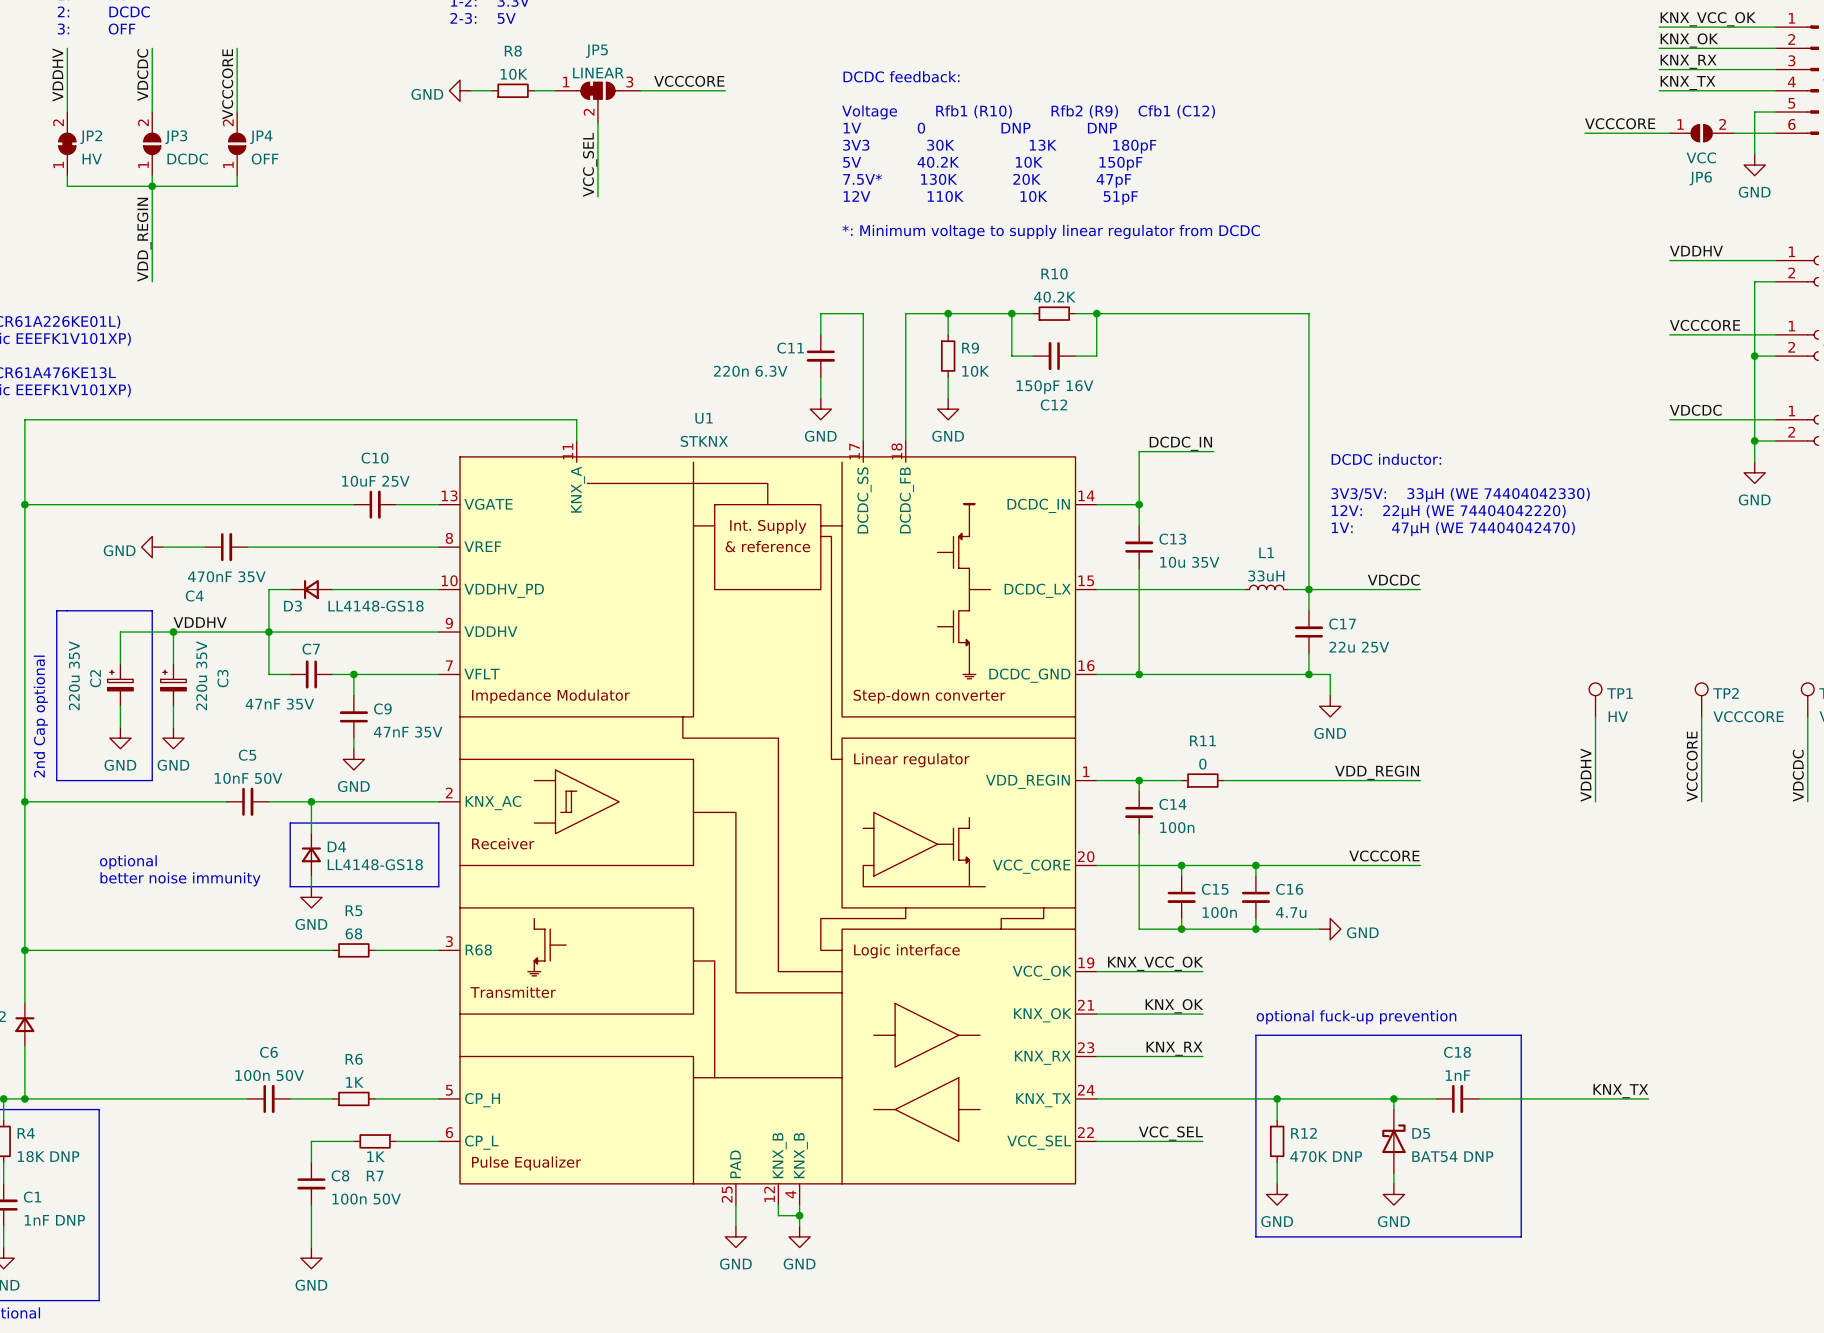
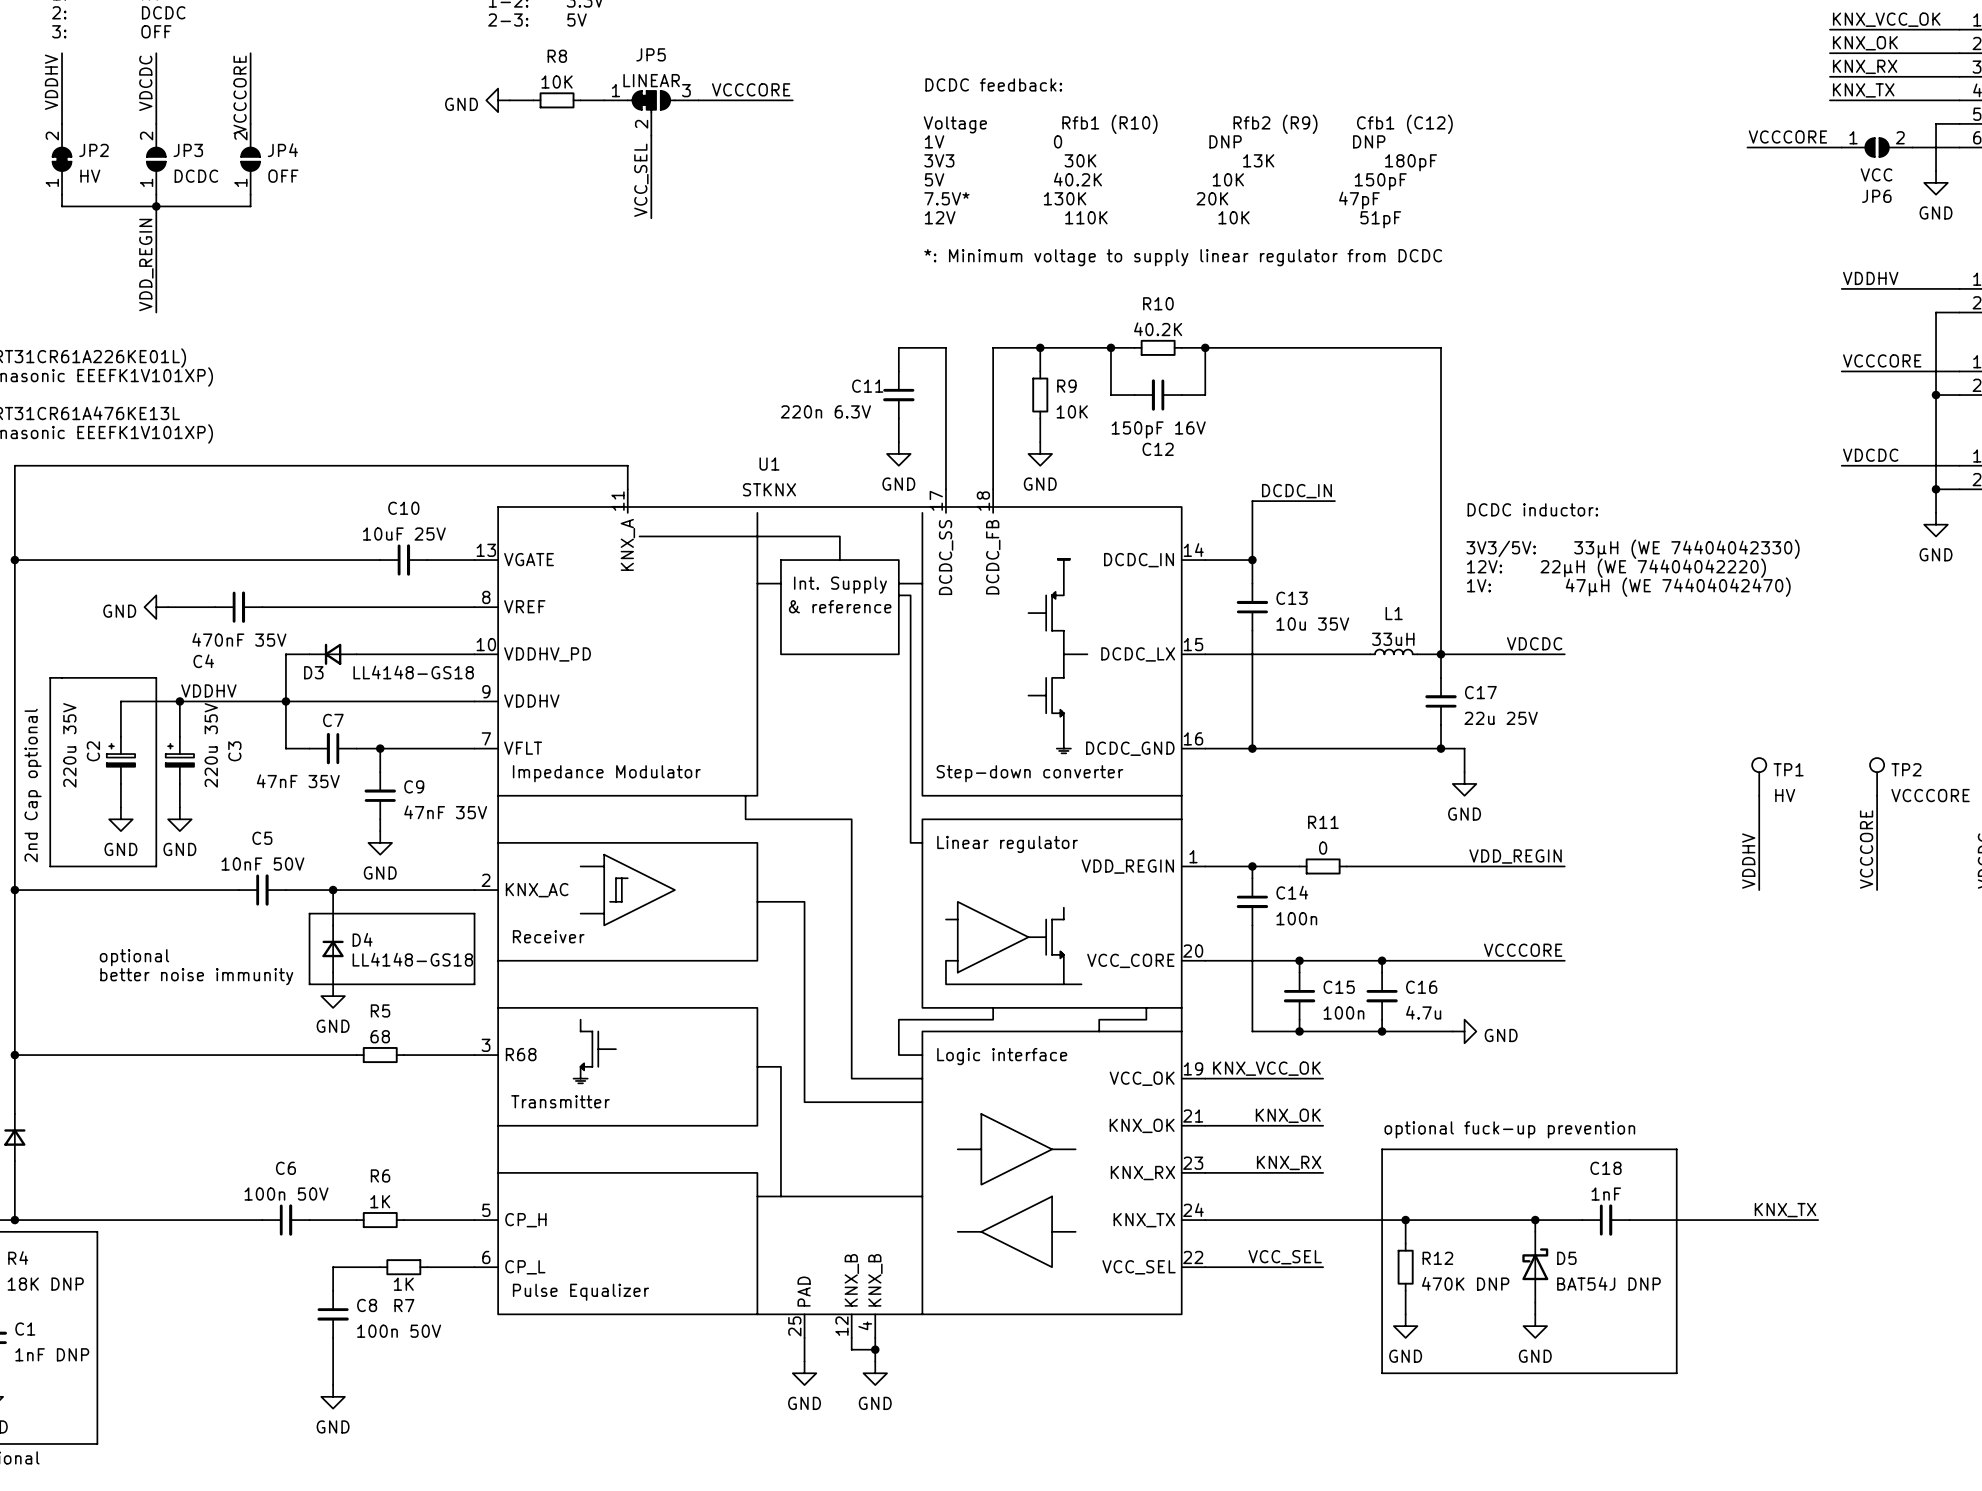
D5 value: BAT54 DNP (1452, 1156) -> BAT54J DNP (1608, 1283)

